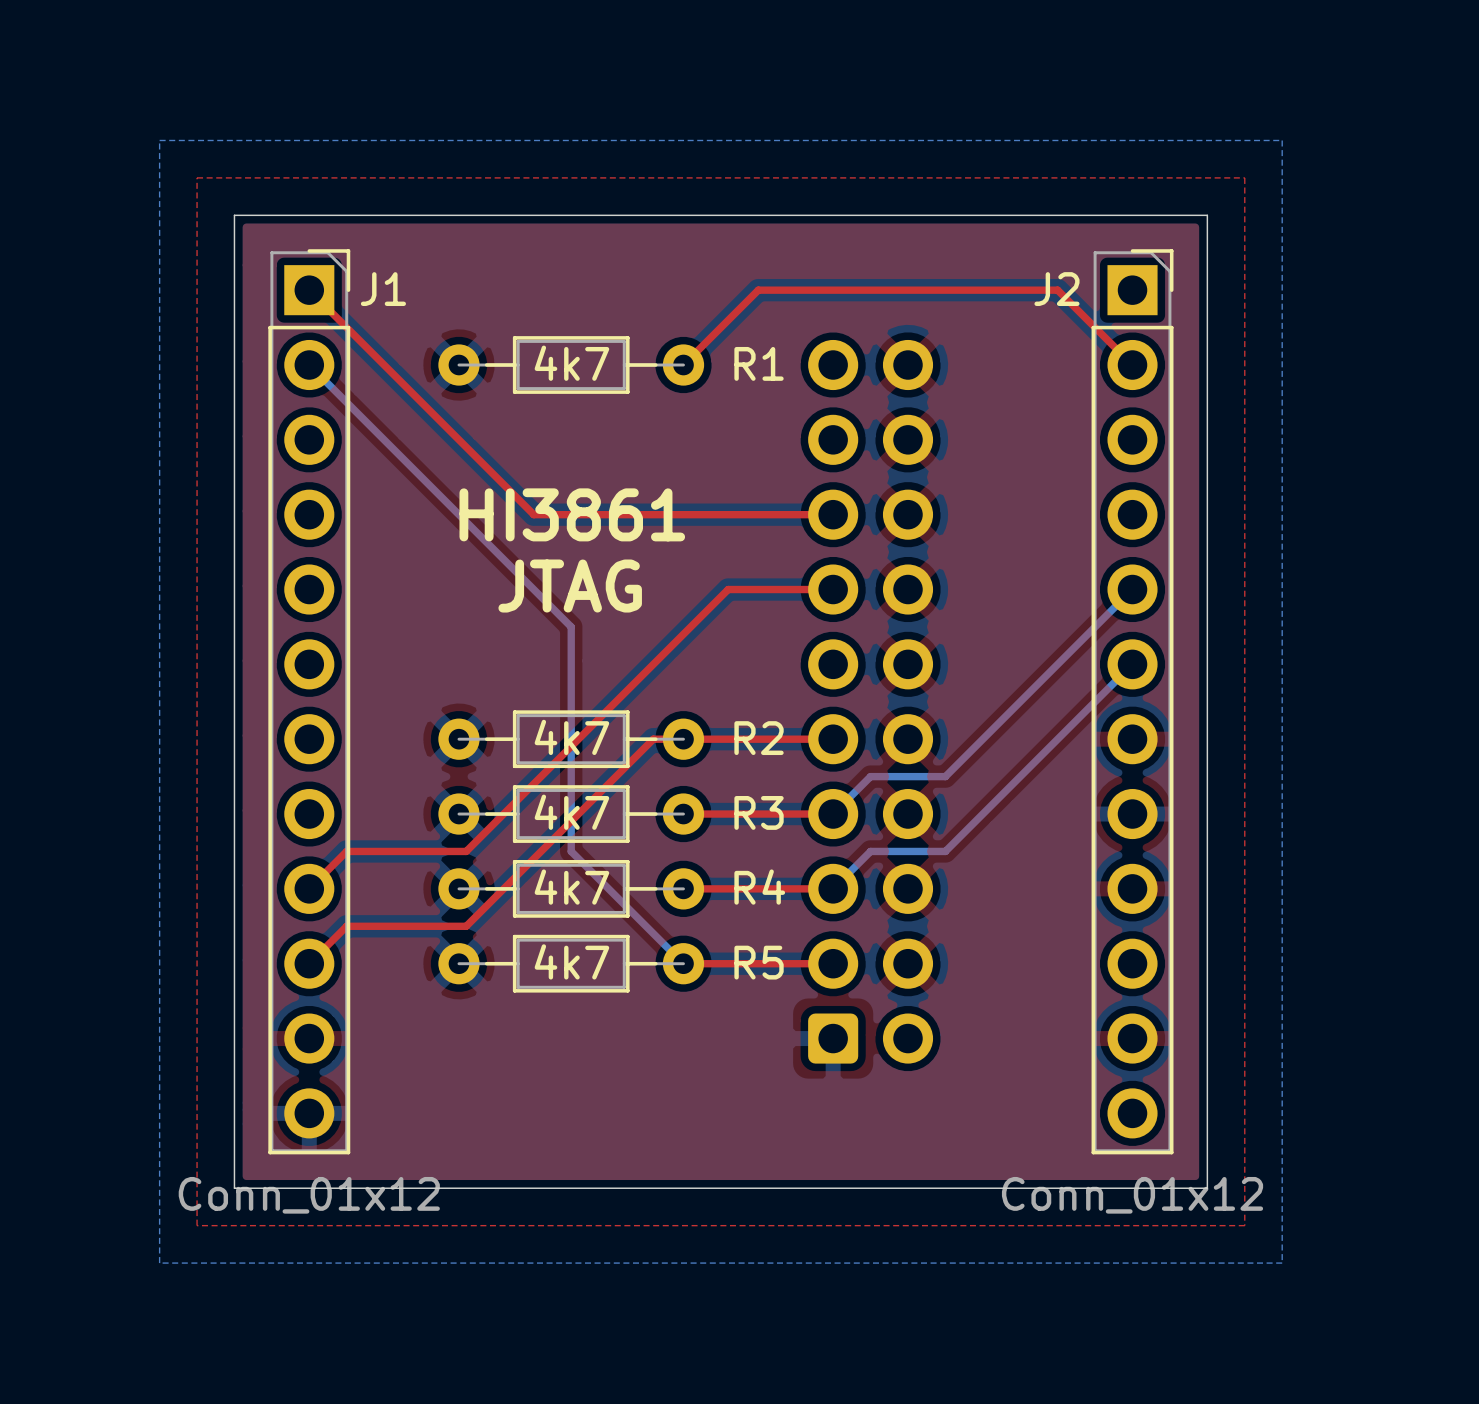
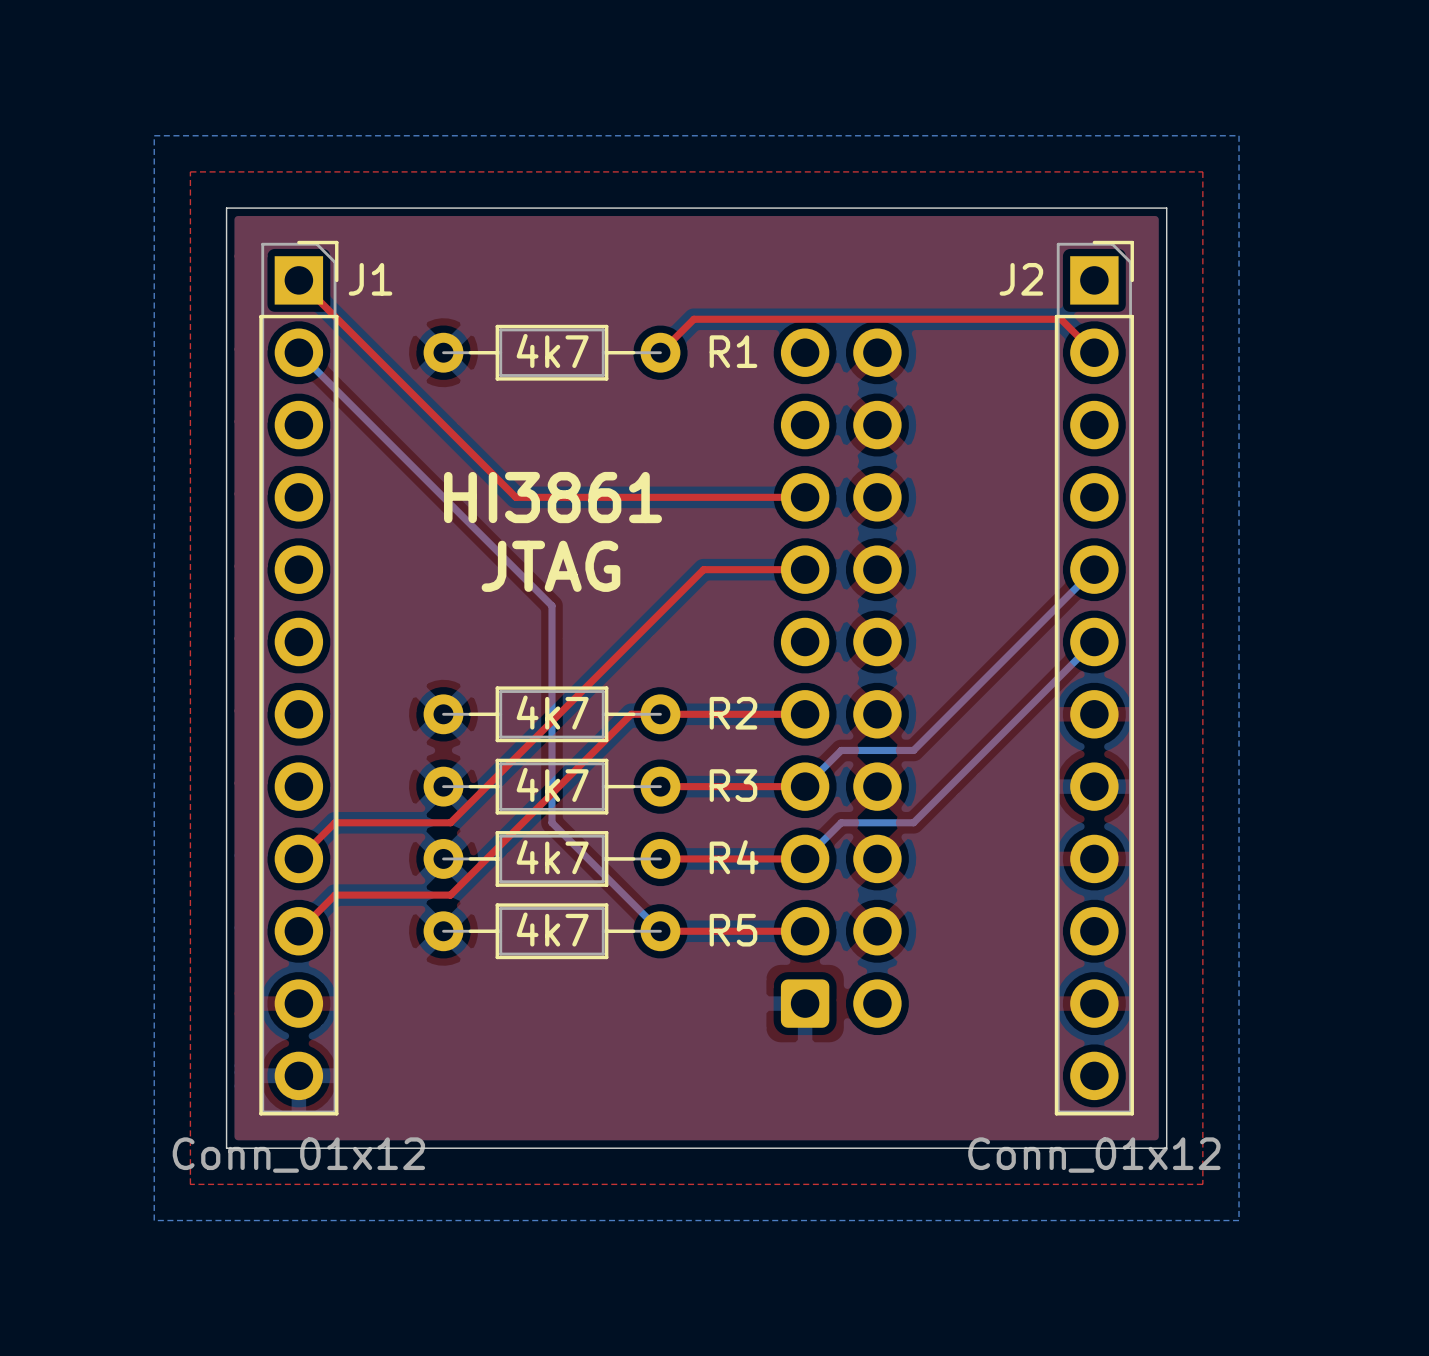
top track: (718, 330) (758, 290) (1057, 290) (1097, 330) -> (693, 319) (1060, 319)

